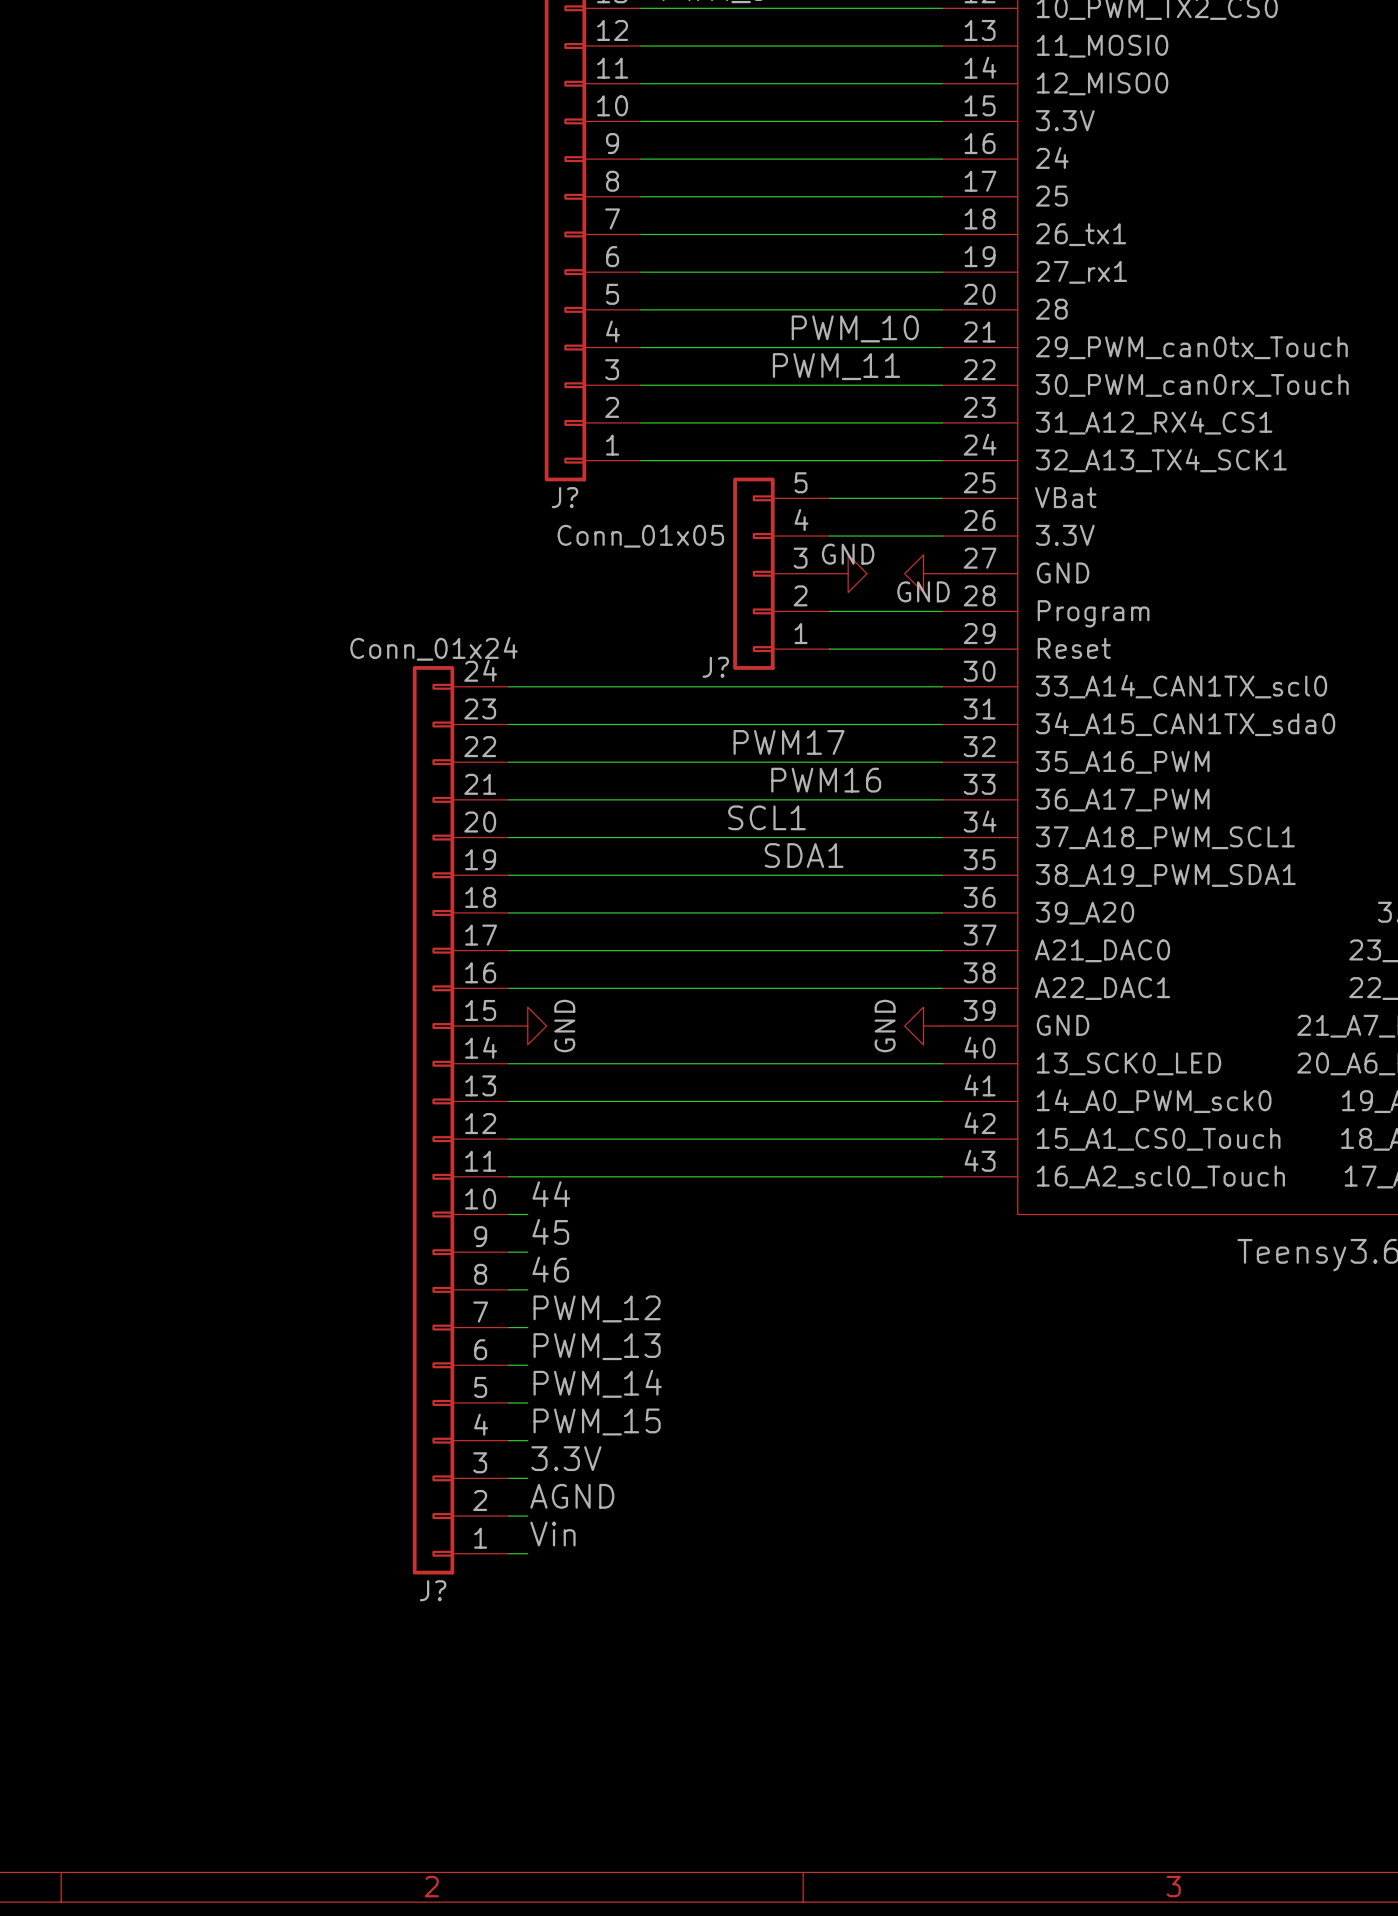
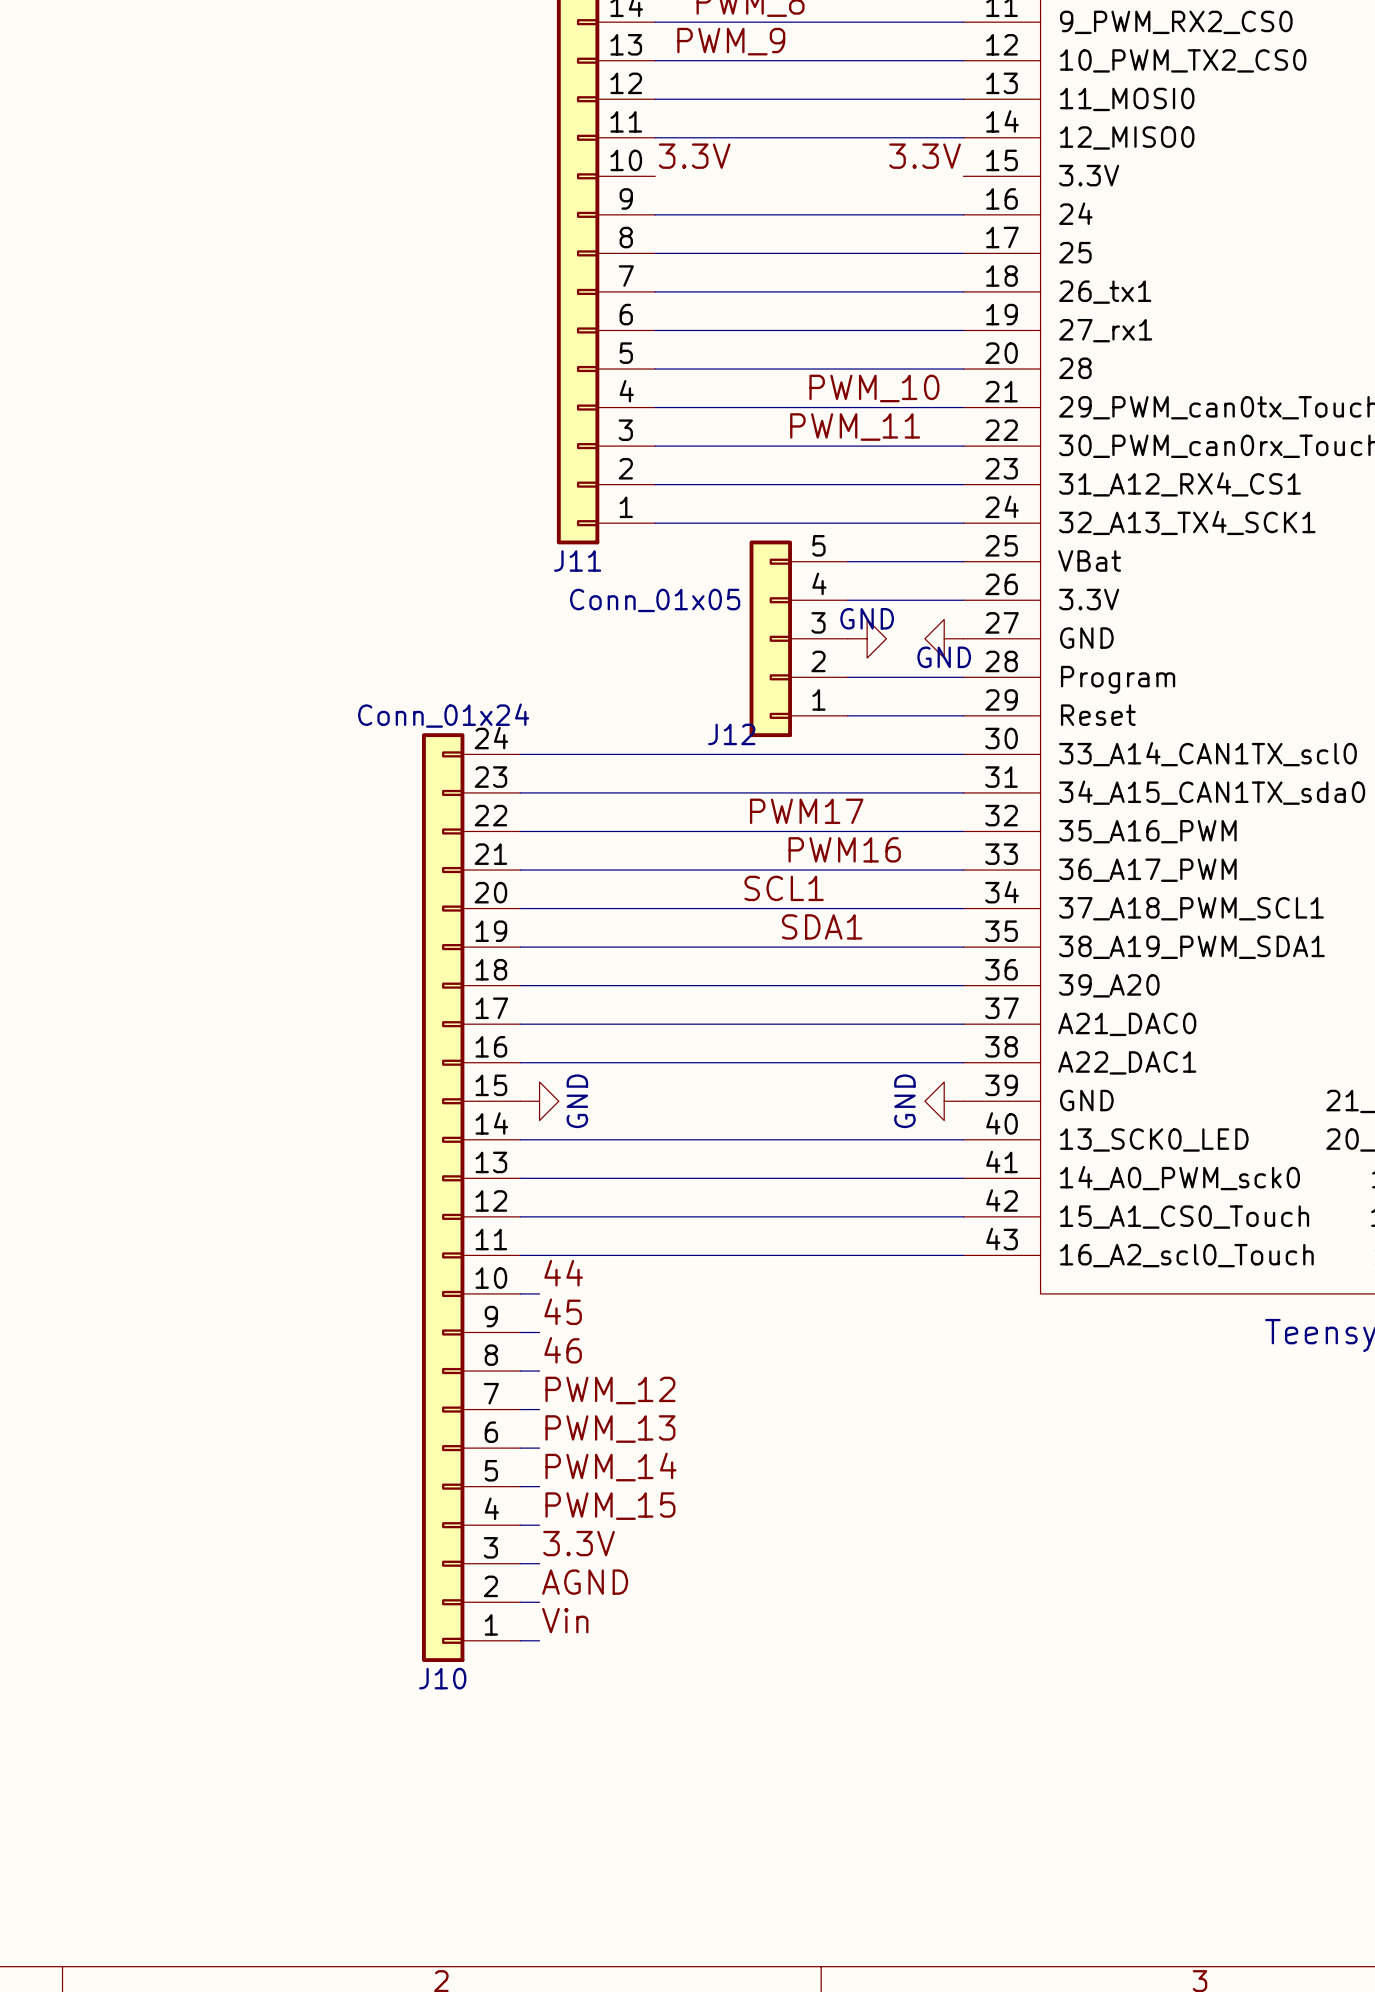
label: none -> 3.3V (694, 156)
label: none -> 3.3V (925, 156)
wire: (640, 121) (942, 121) -> none
J? name: J? (565, 497) -> J11 (577, 560)
J? name: J? (715, 667) -> J12 (731, 734)
J? name: J? (433, 1590) -> J10 (442, 1678)

